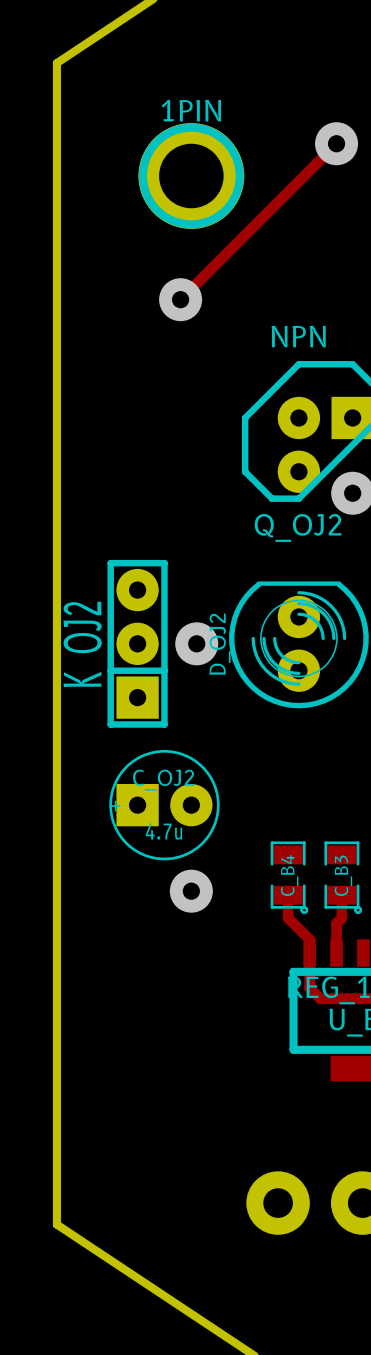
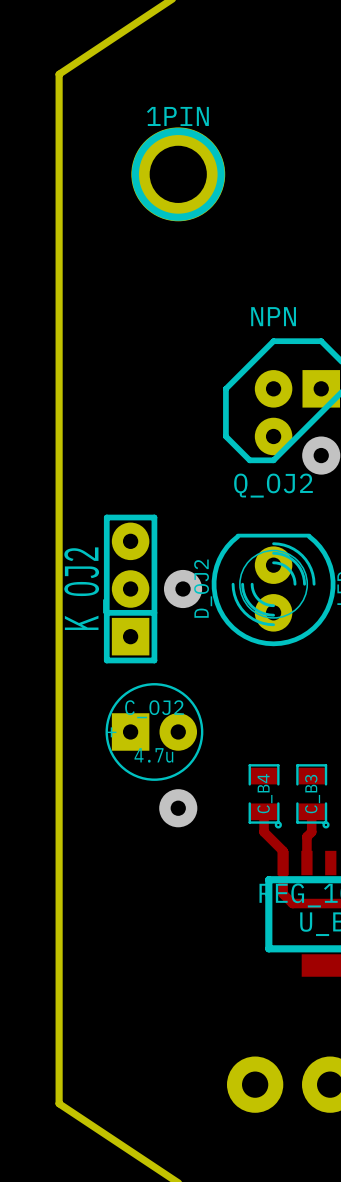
track: (336, 143) (180, 299) -> none
via: (336, 143) -> none
via: (180, 299) -> none

